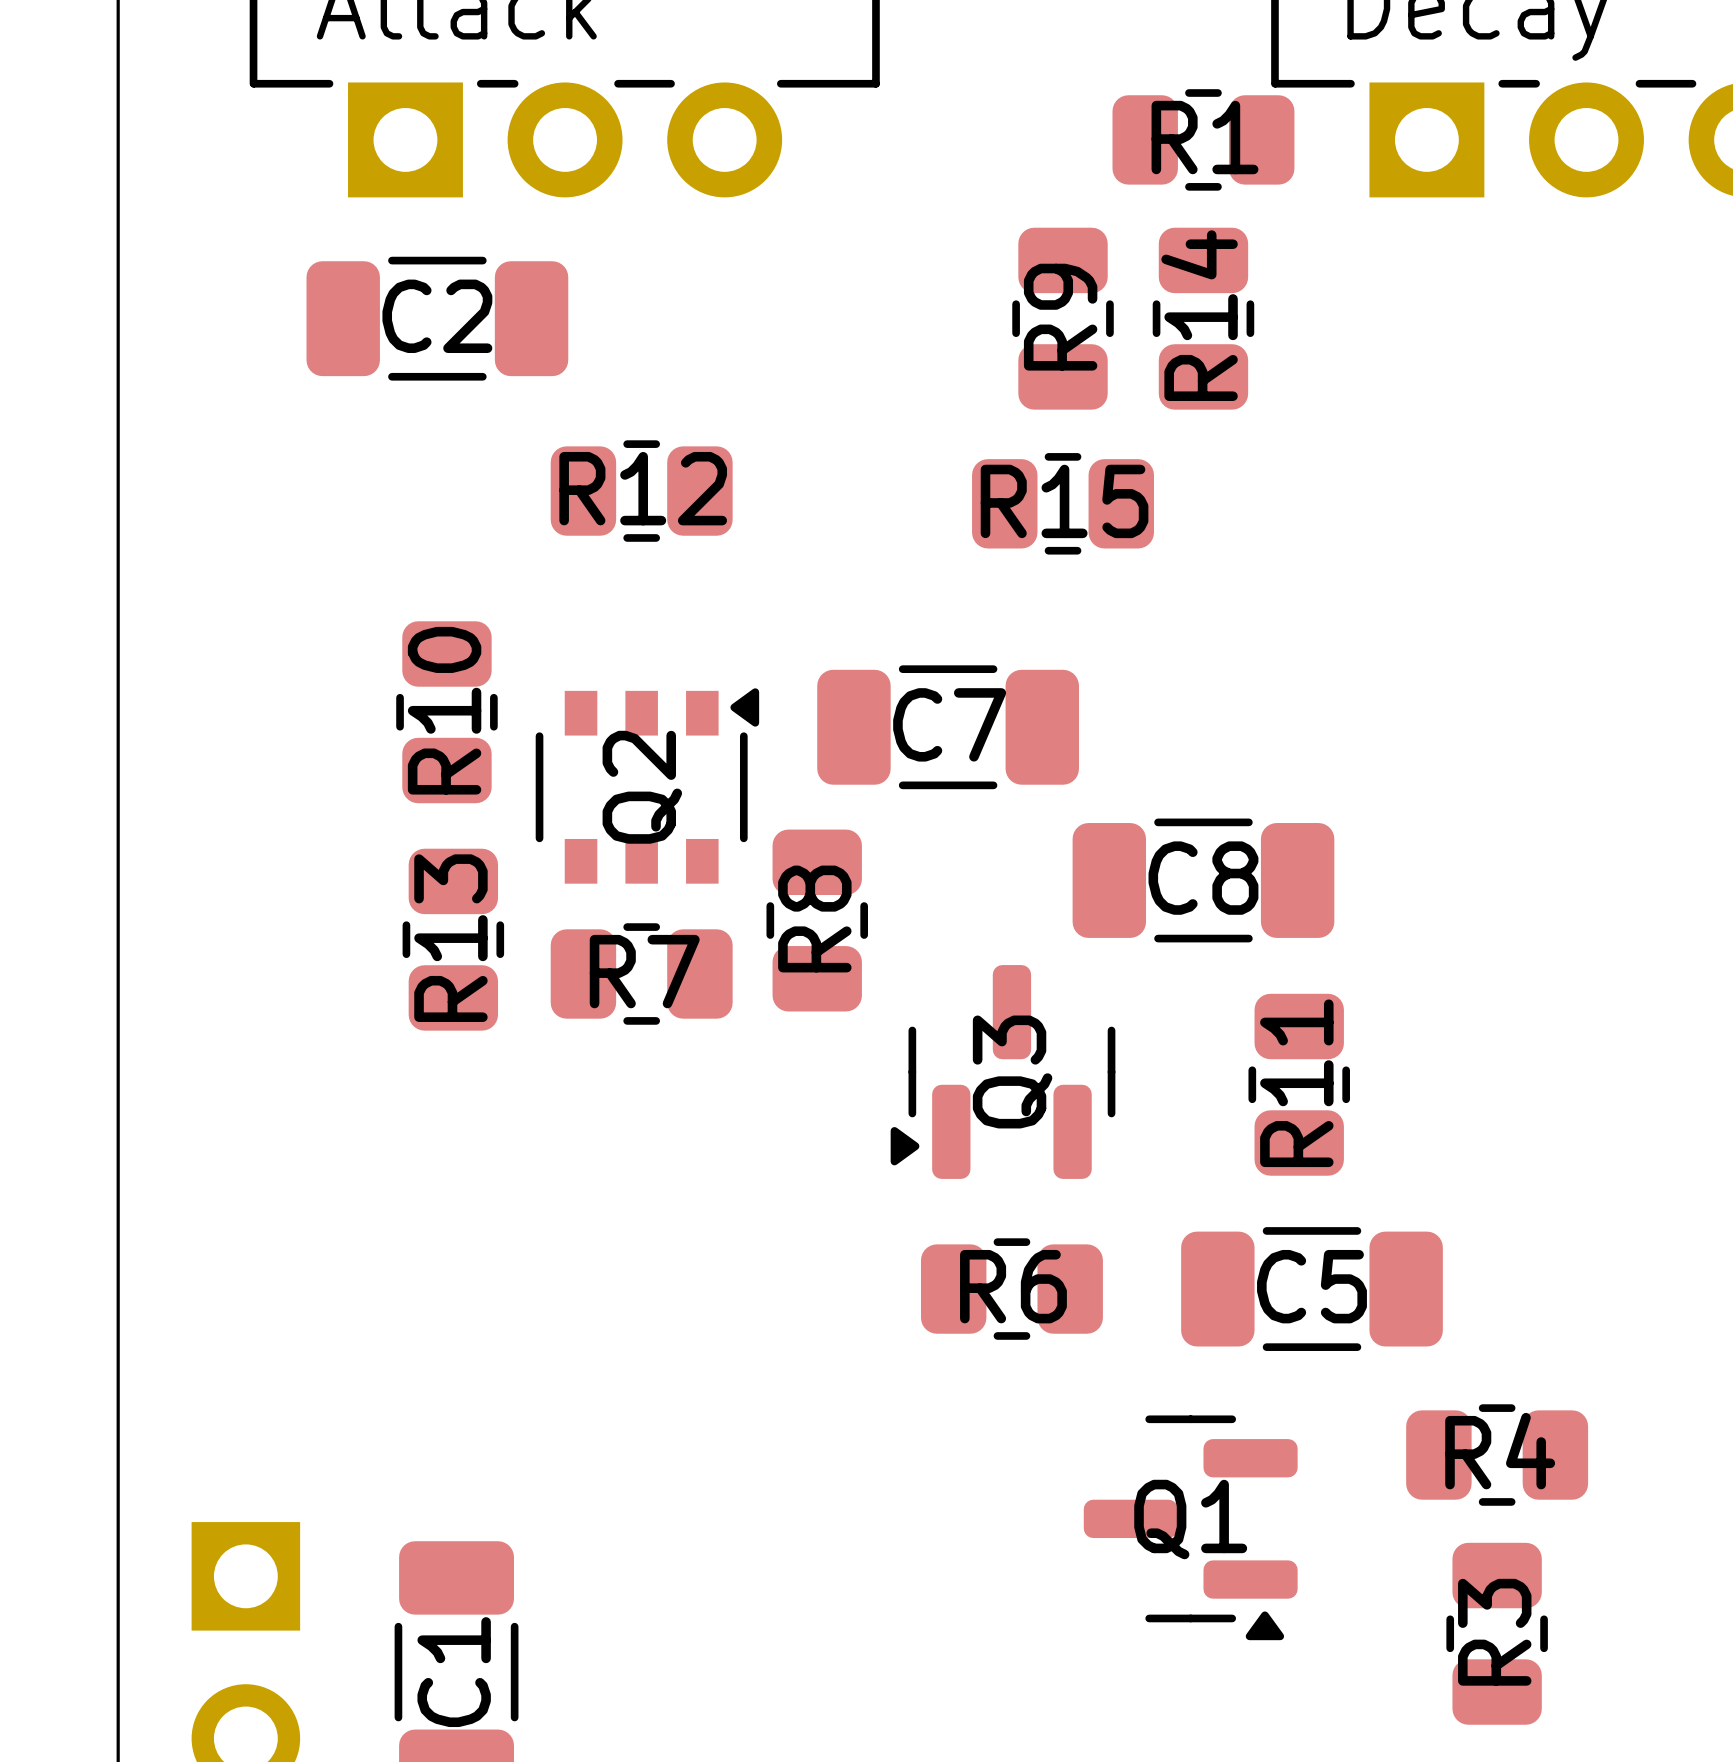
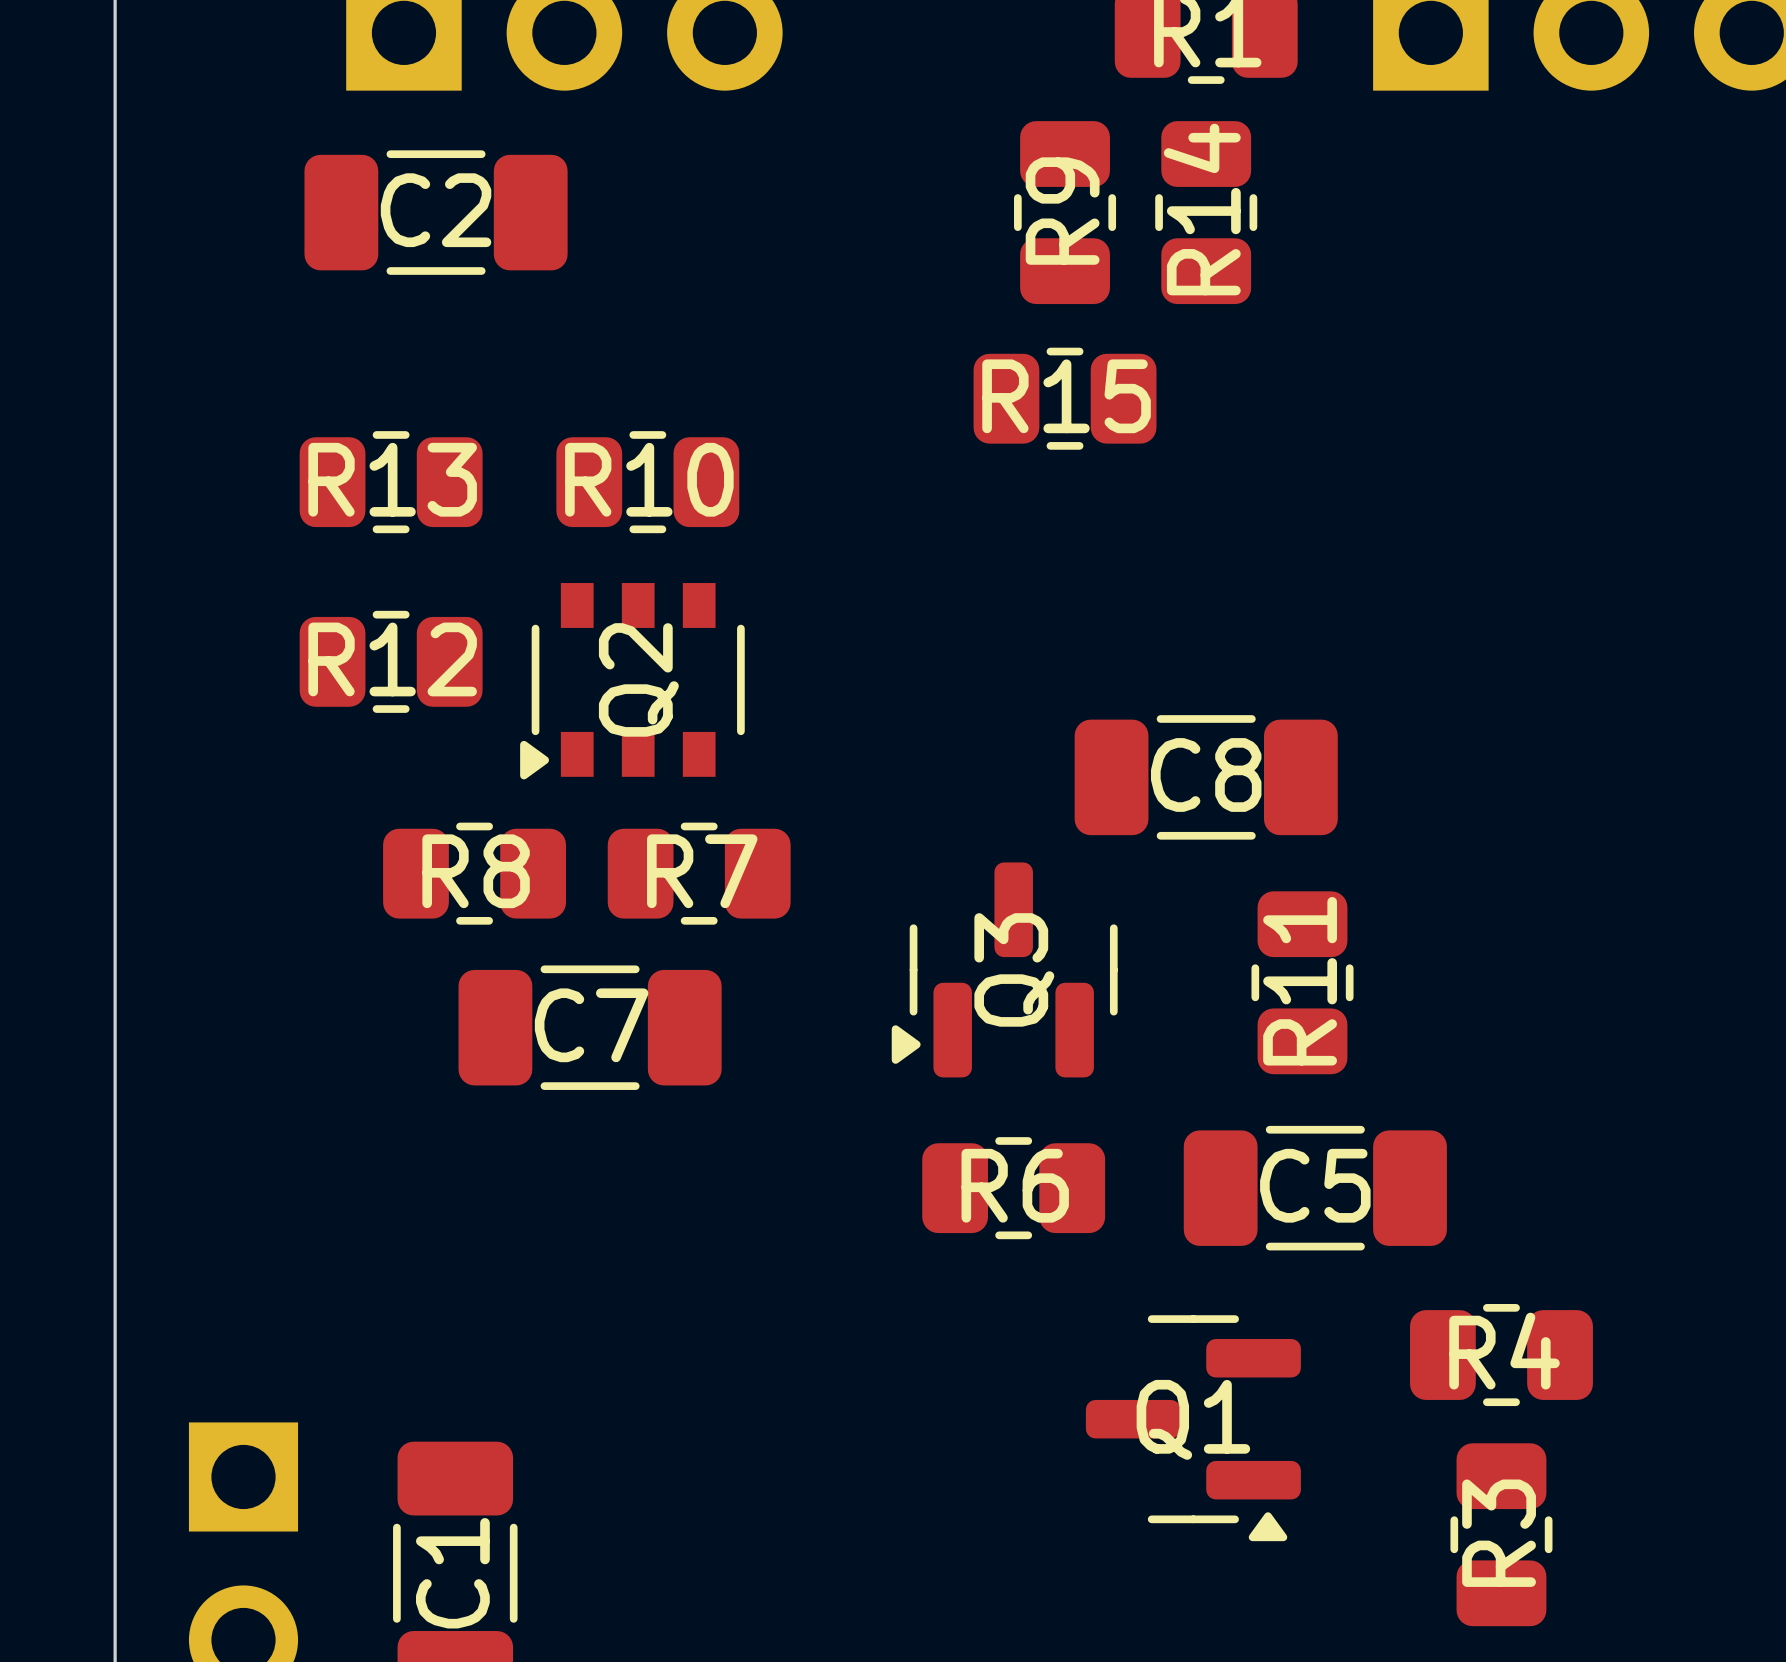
R12 position: (641, 491) -> (391, 661)
R10 rotation: 0° (446, 712) -> 90° clockwise (647, 482)
R10 position: (446, 712) -> (647, 482)
C7 position: (948, 727) -> (590, 1027)
Q2 rotation: 0° (647, 785) -> 180° (632, 681)
R8 rotation: 0° (817, 920) -> 90° clockwise (474, 873)
R8 position: (817, 920) -> (474, 873)
R13 rotation: 0° (453, 939) -> 90° clockwise (391, 482)
R13 position: (453, 939) -> (391, 482)
R7 position: (641, 974) -> (699, 873)

